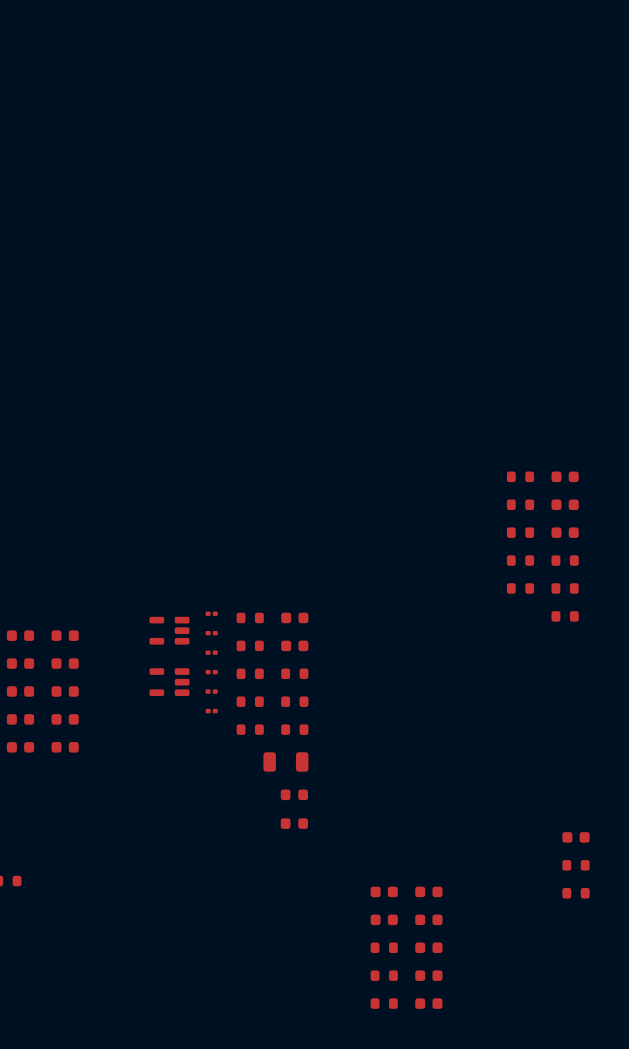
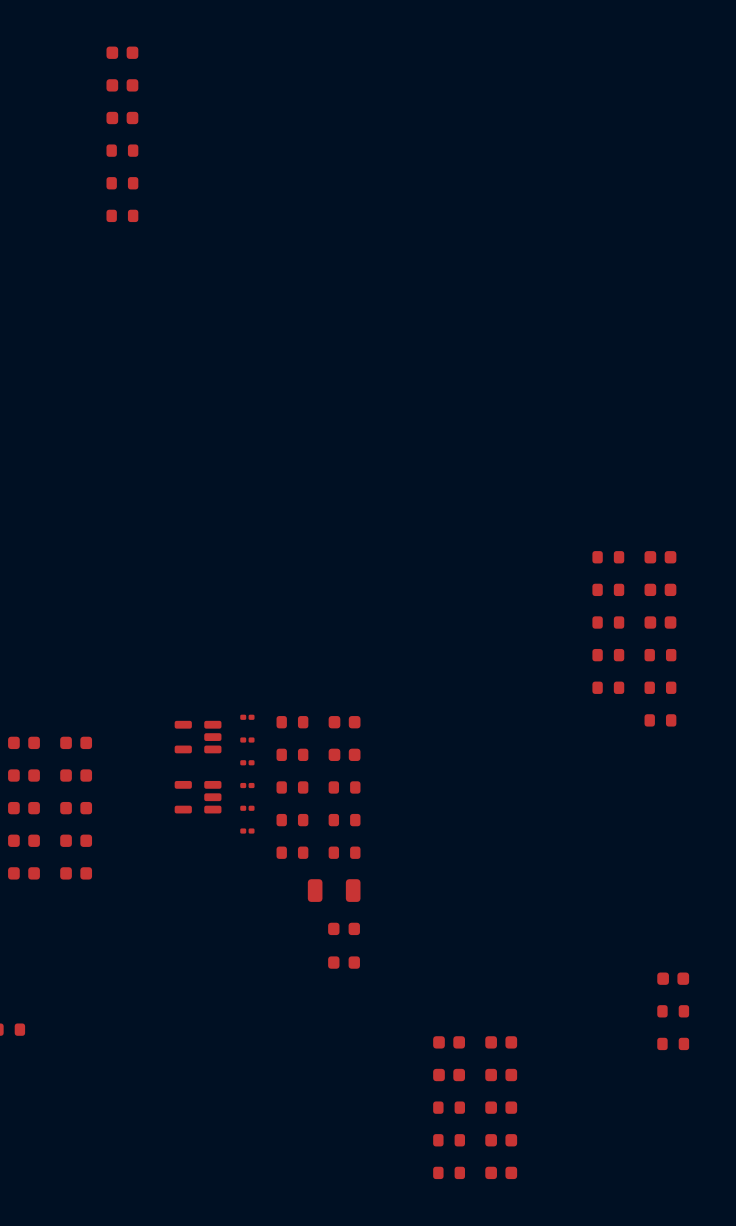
part: none -> (122, 52)
part: none -> (122, 85)
part: none -> (122, 118)
part: none -> (122, 150)
part: none -> (122, 183)
part: none -> (122, 215)

